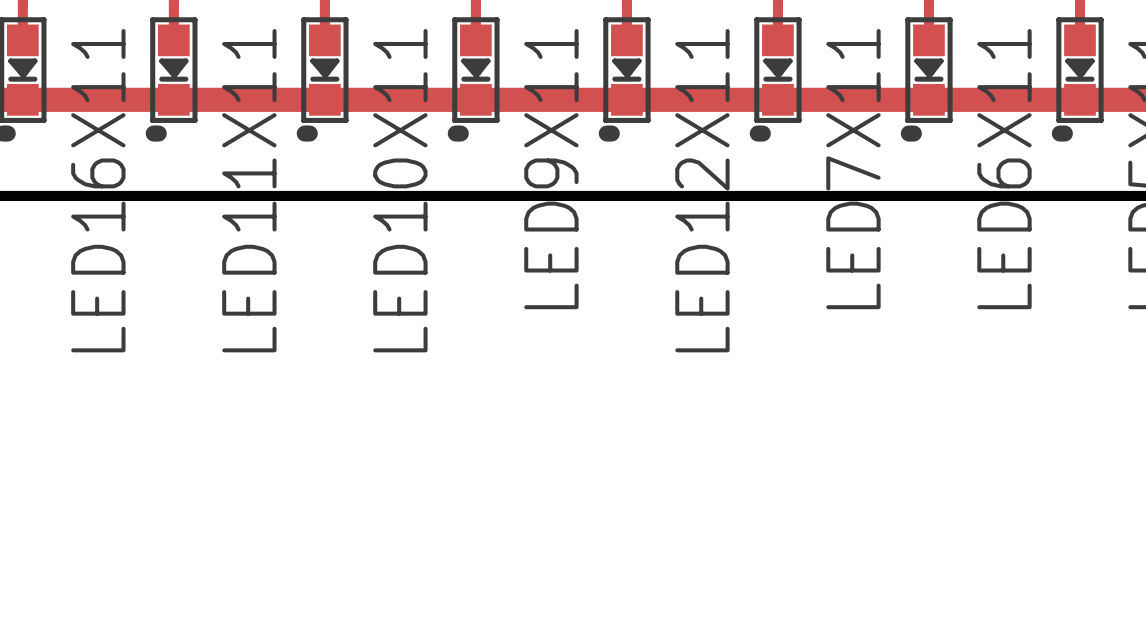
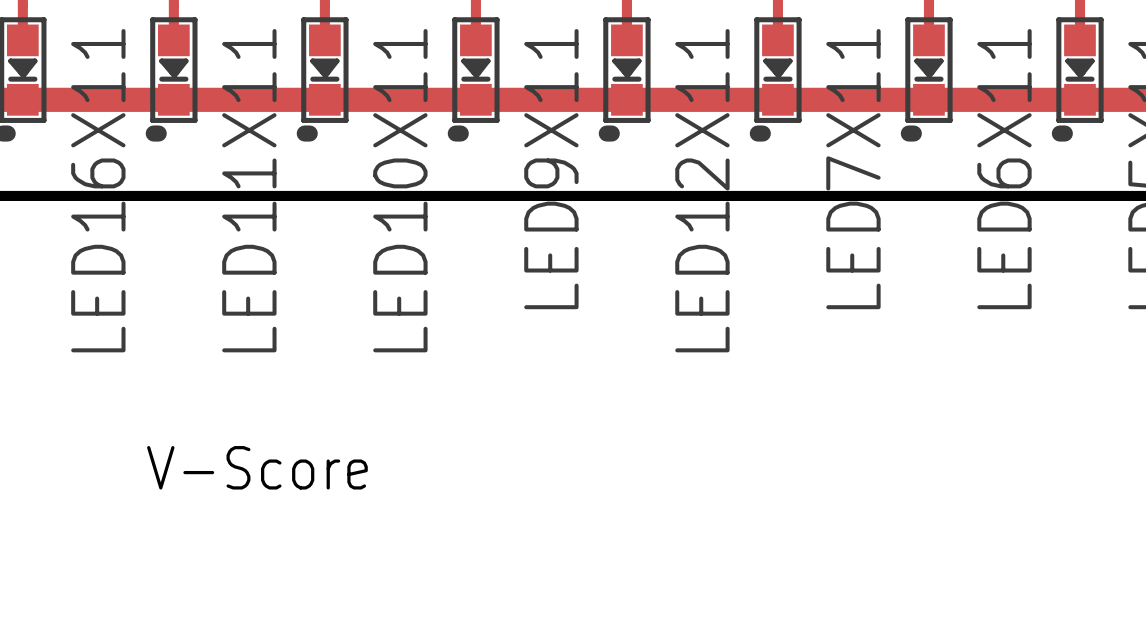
text: none -> V-Score (257, 467)

